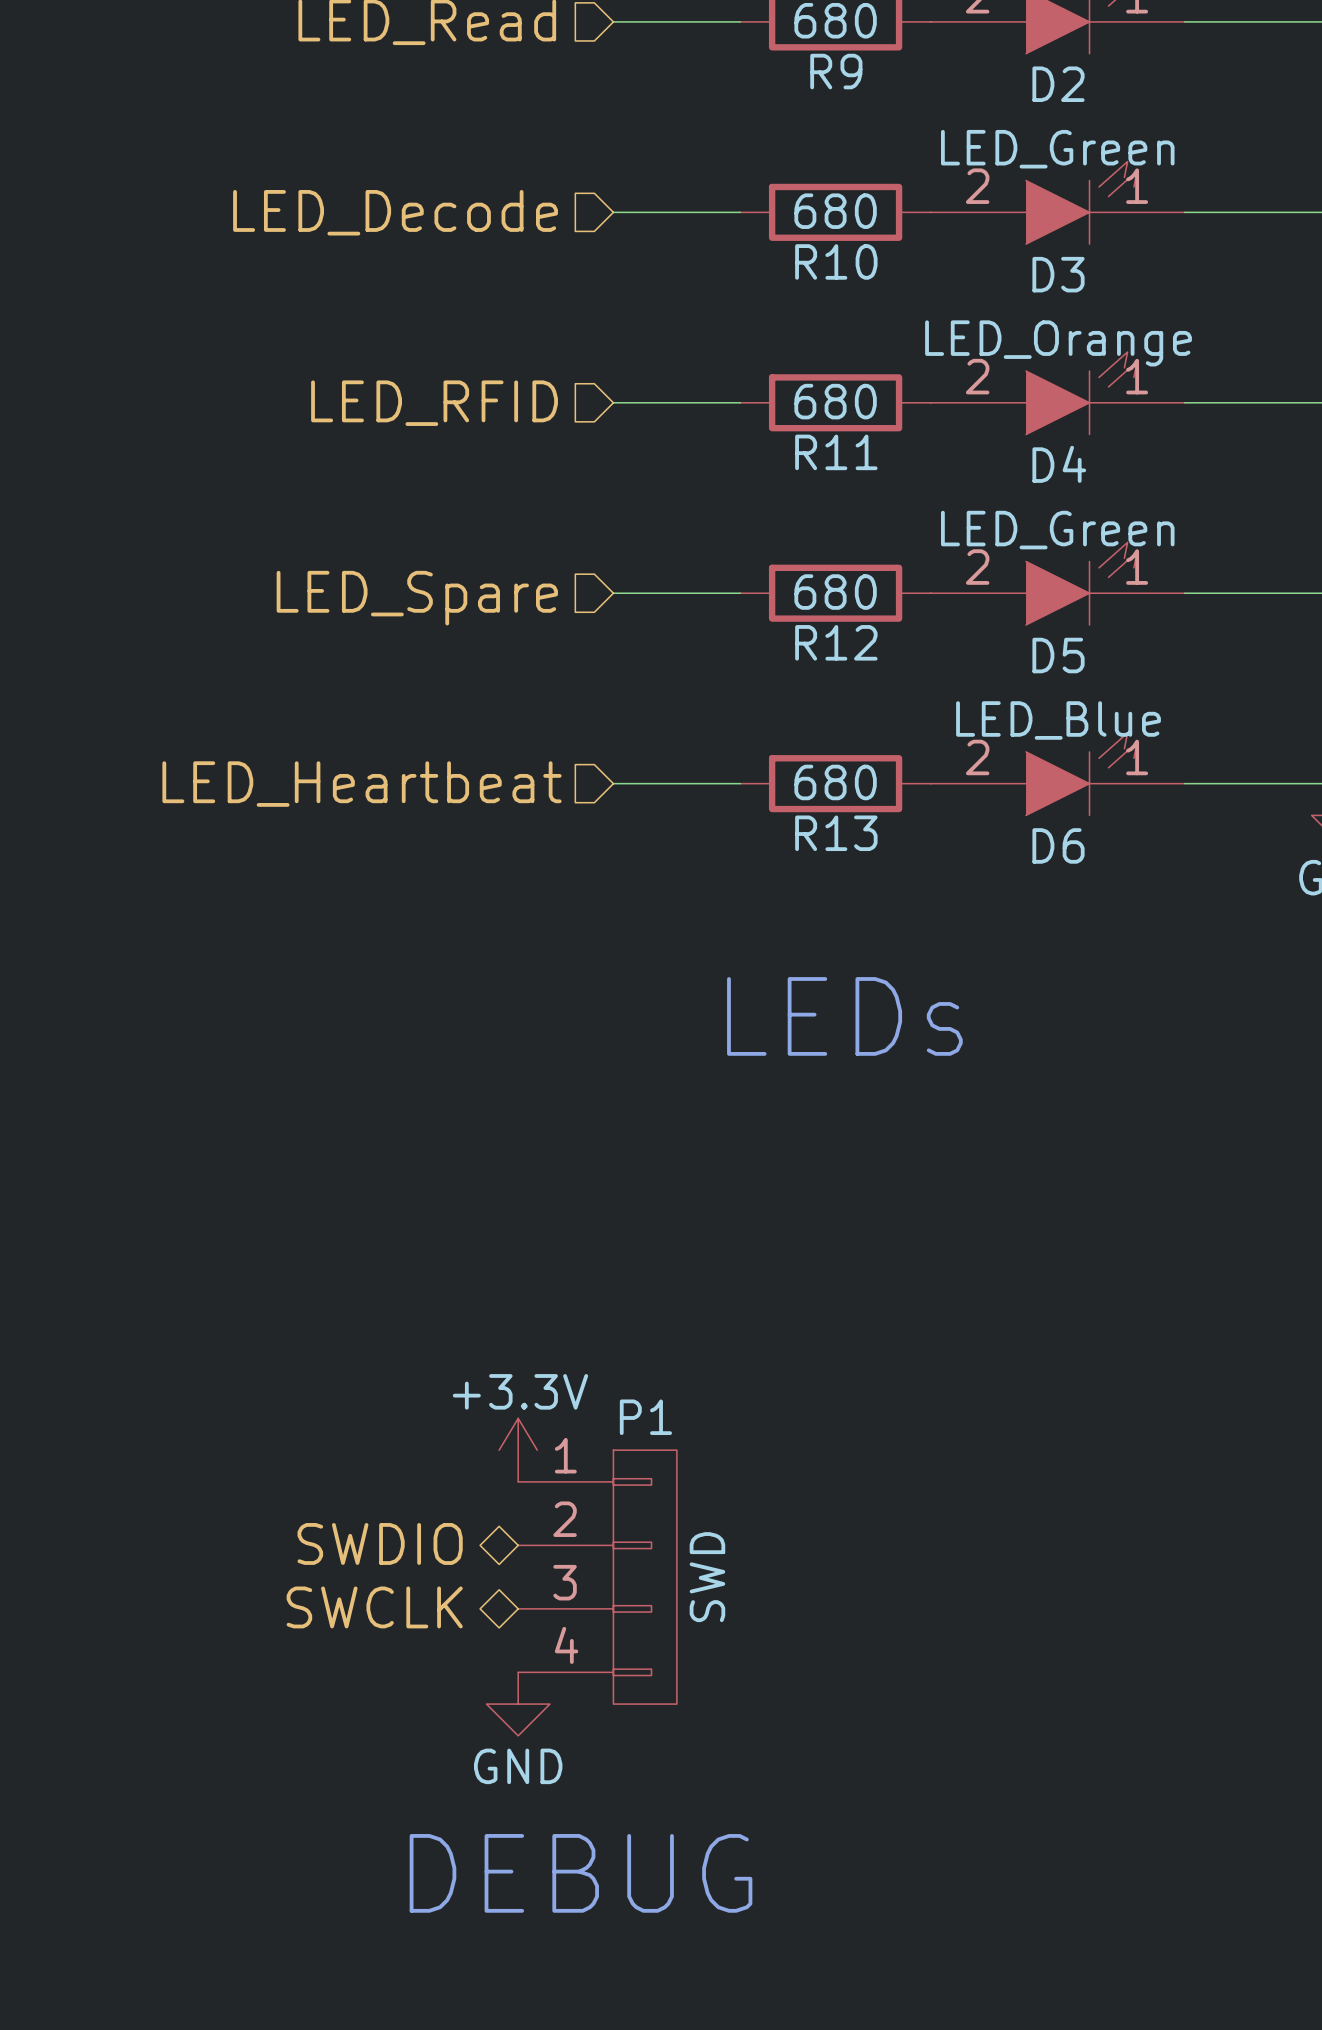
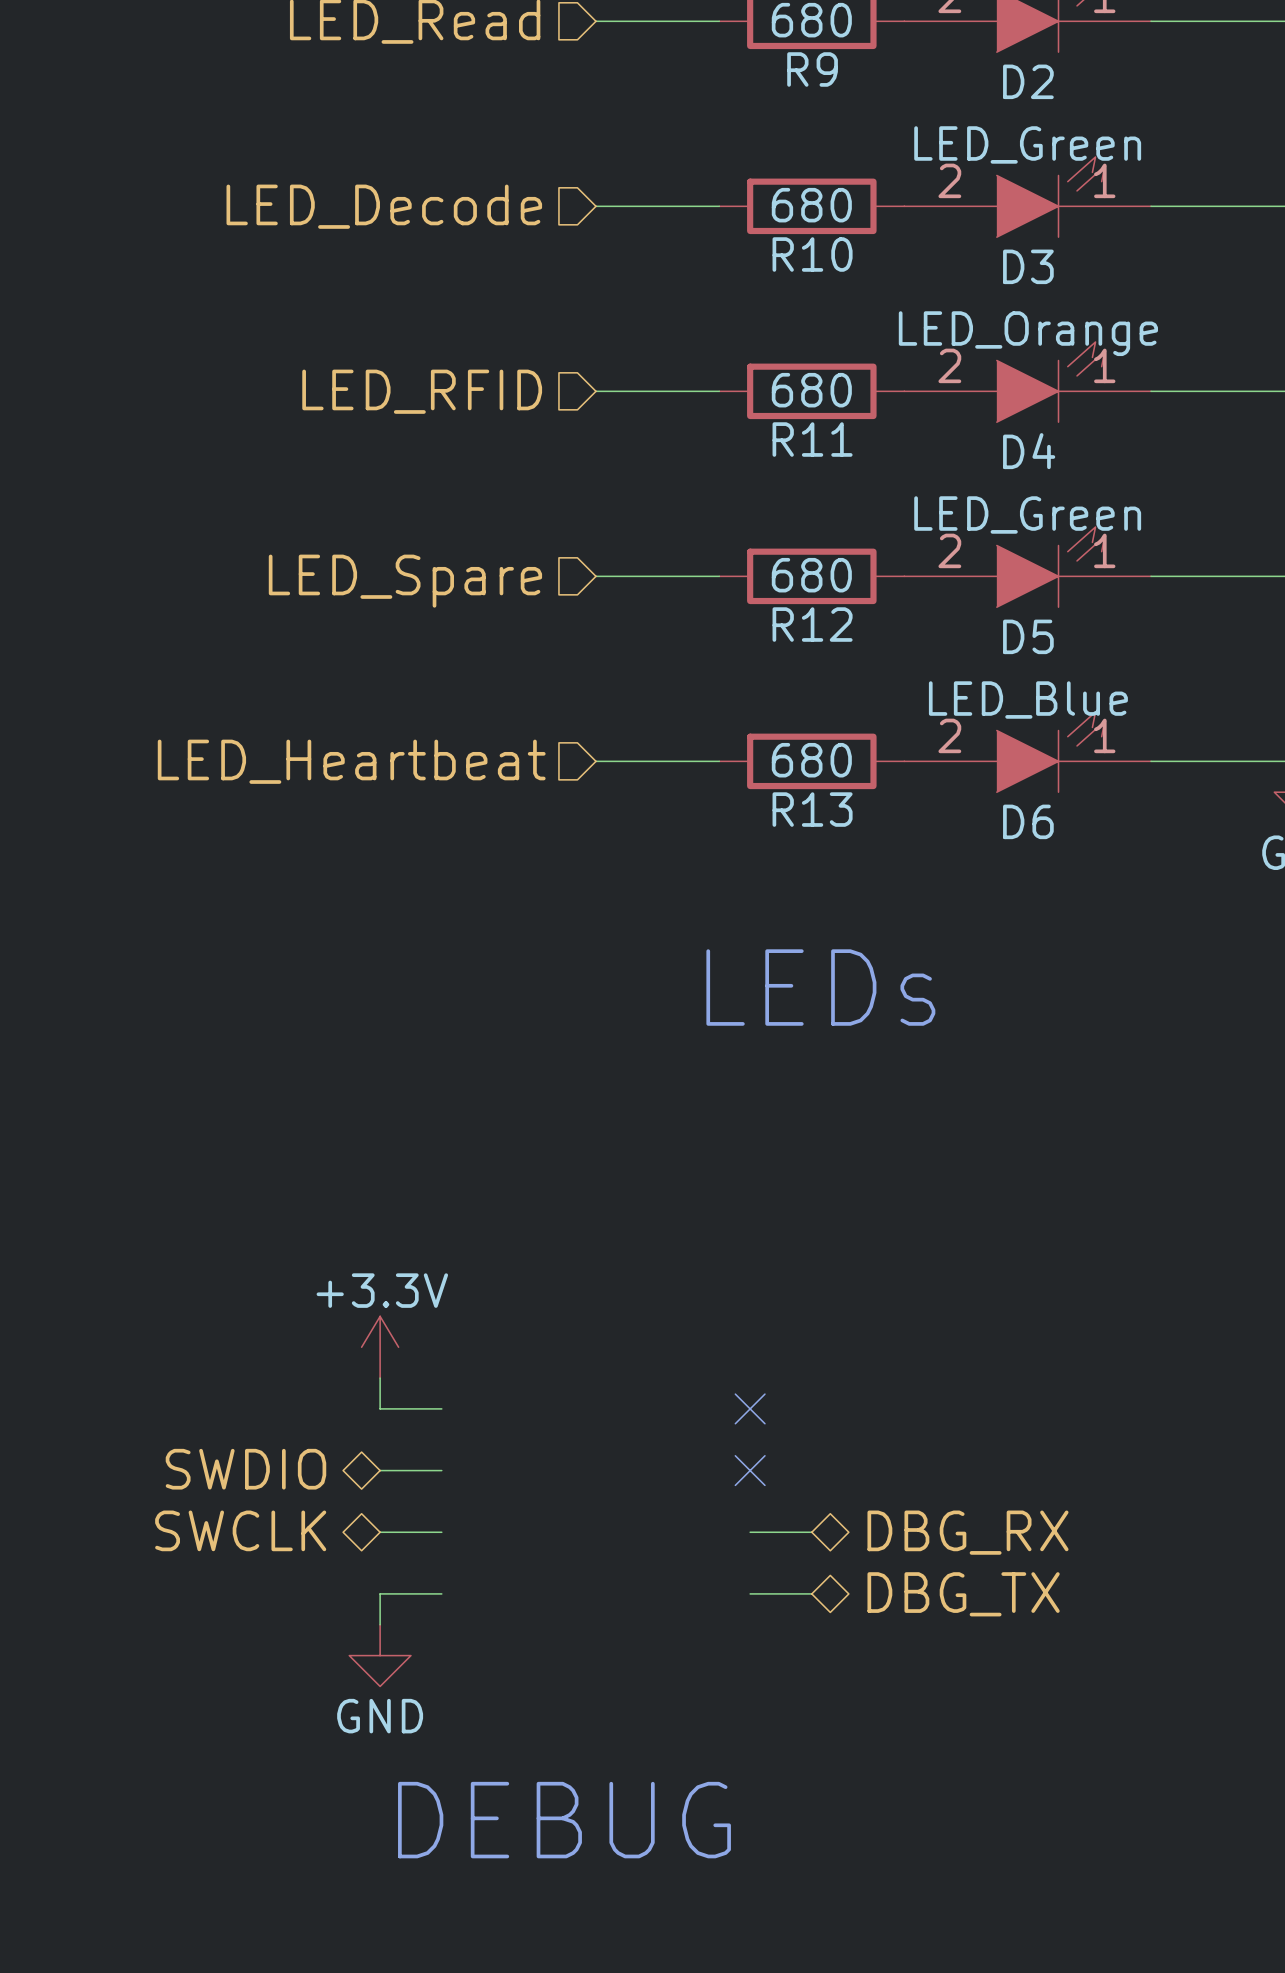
wire: none -> (380, 1378) (380, 1408) (441, 1408)
power symbol position: +3.3V (518, 1450) -> +3.3V (380, 1347)
no-connect mark: none -> (750, 1408)
wire: none -> (380, 1470) (441, 1470)
no-connect mark: none -> (750, 1470)
hierarchical label position: SWDIO (380, 1543) -> SWDIO (245, 1469)
wire: none -> (380, 1532) (441, 1532)
P1: SWD (597, 1577) -> none
wire: none -> (750, 1532) (811, 1532)
hierarchical label: none -> DBG_RX (967, 1532)
hierarchical label position: SWCLK (374, 1607) -> SWCLK (240, 1530)
wire: none -> (441, 1593) (380, 1593) (380, 1624)
wire: none -> (750, 1593) (811, 1593)
hierarchical label: none -> DBG_TX (963, 1594)
power symbol position: GND (518, 1704) -> GND (380, 1655)

